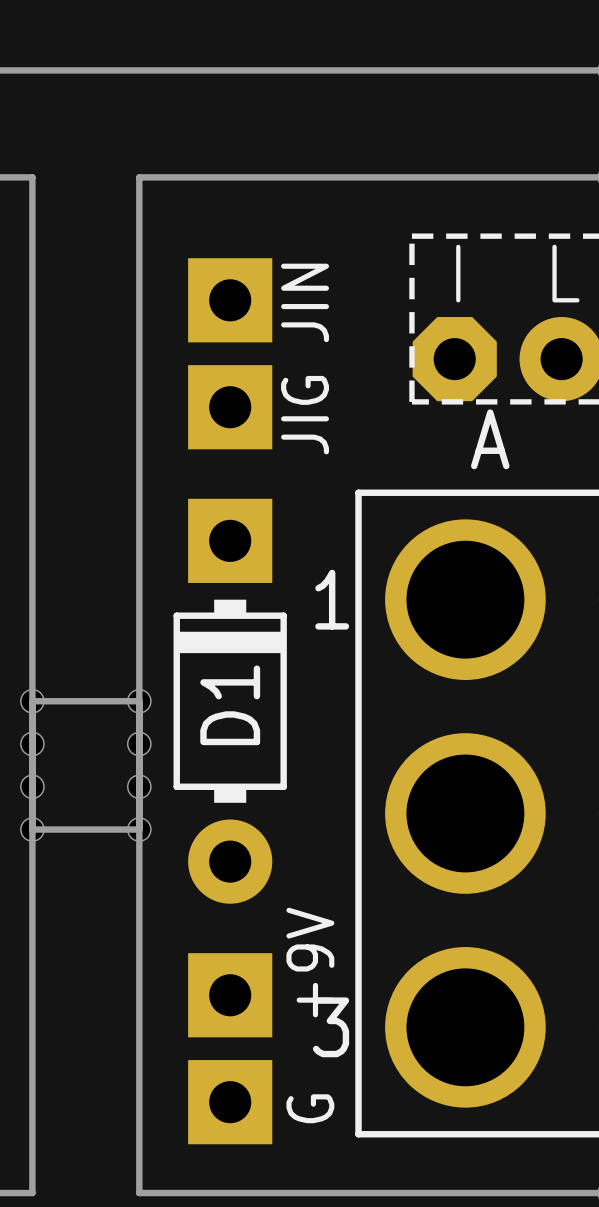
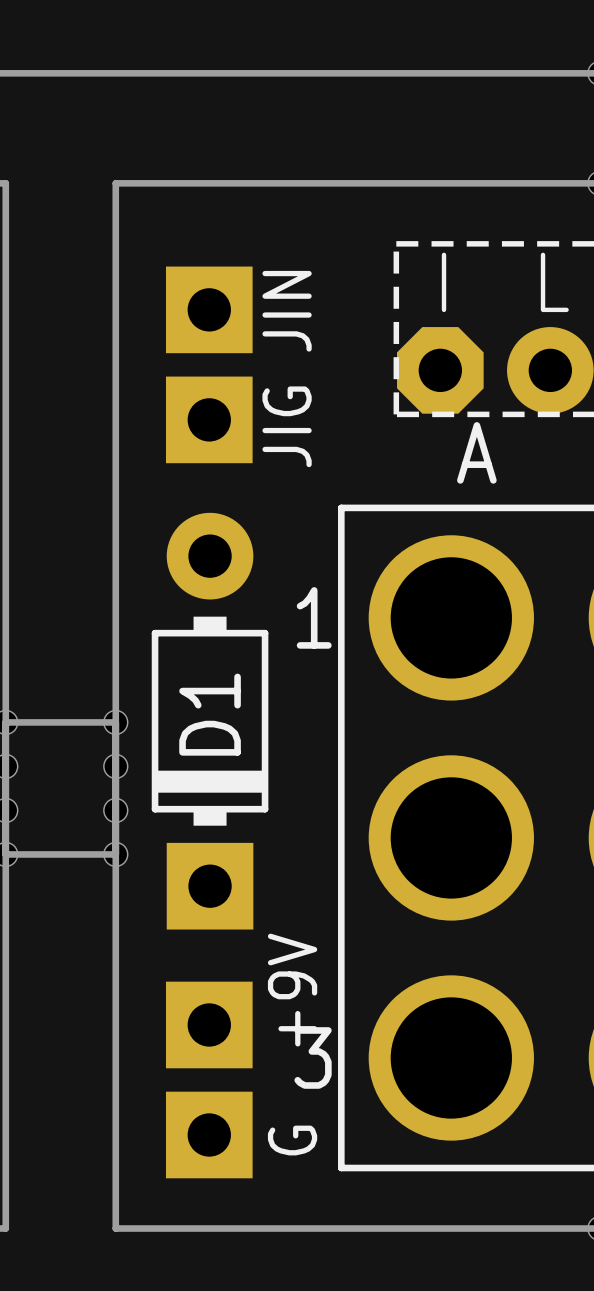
text: none -> JIN (287, 311)
JIN name: JIN (305, 302) -> none
text: none -> JIG (287, 426)
JIG name: JIG (305, 415) -> none
text: none -> D1 (210, 714)
part: none -> (210, 721)
D1: (230, 701) -> none
text: none -> +9V (292, 990)
+9V name: +9V (310, 962) -> none
text: none -> G (292, 1140)
G name: G (310, 1108) -> none

